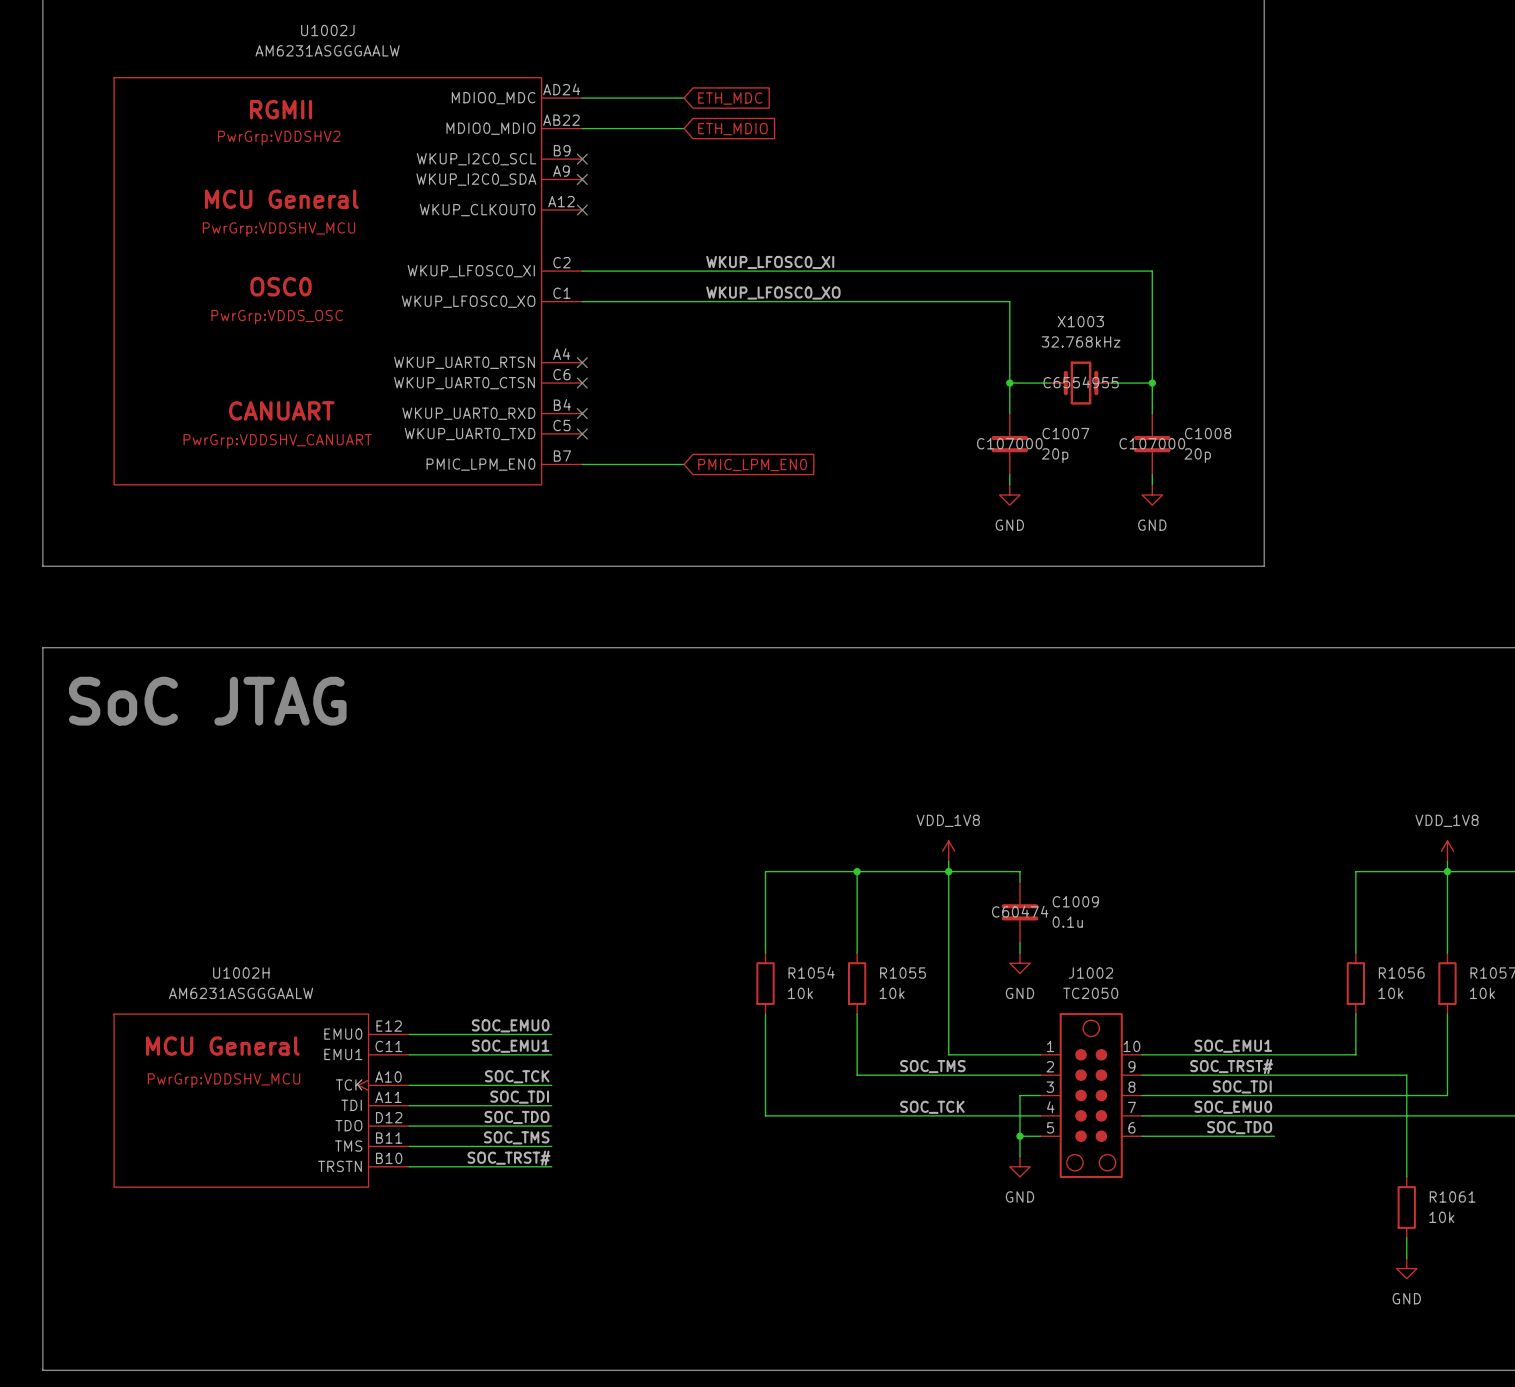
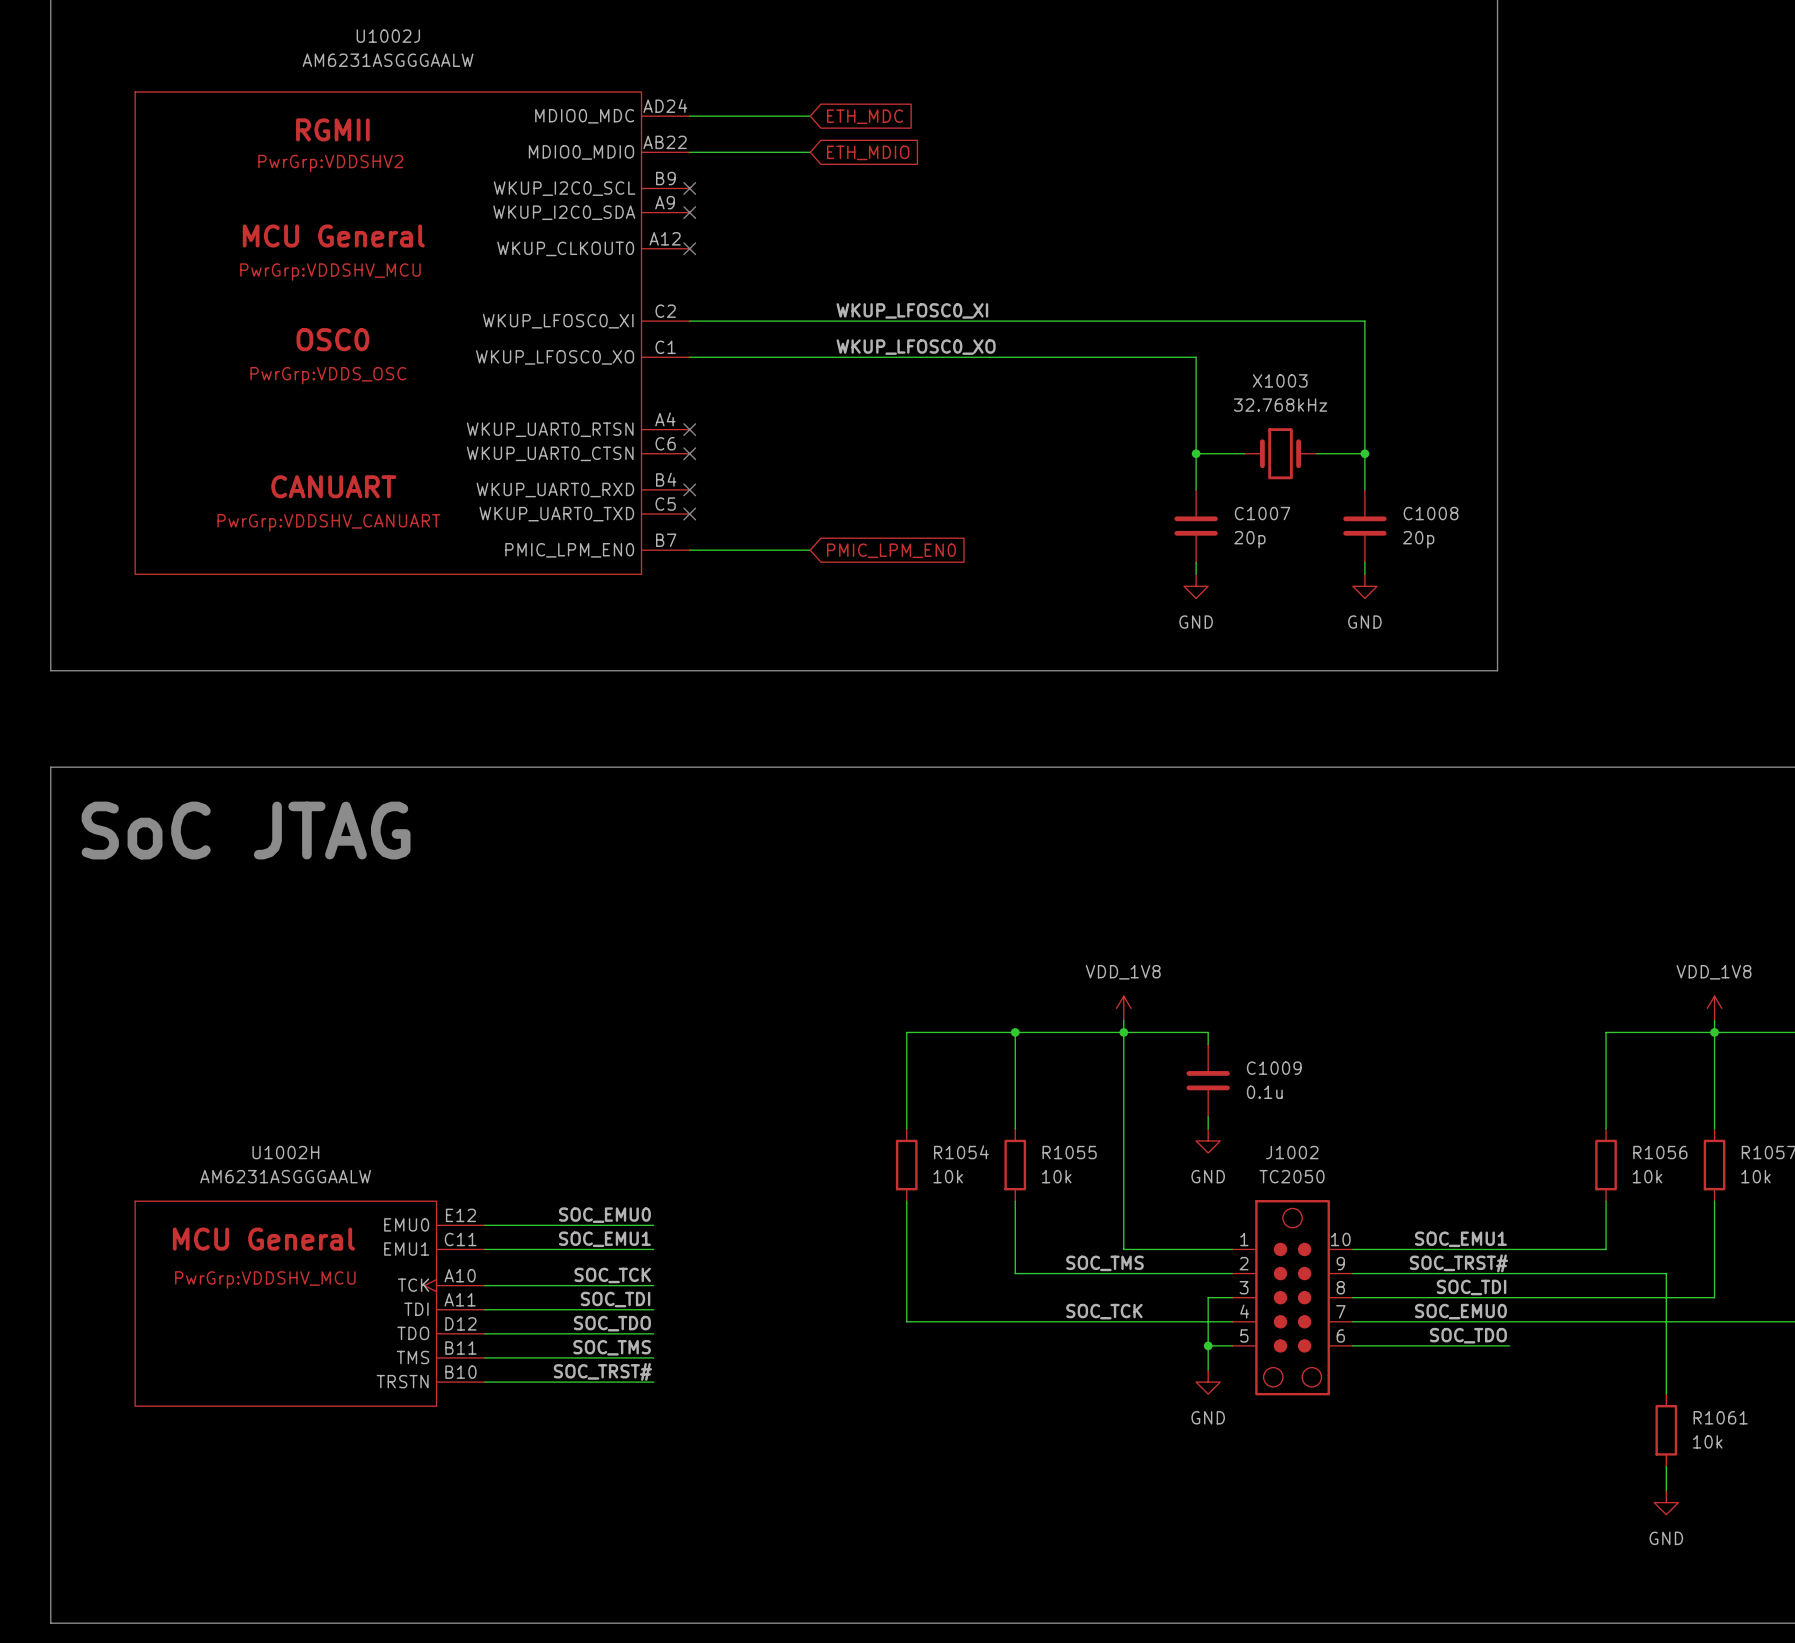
X1003 text: C6554955 (1081, 382) -> none
C1007 text: C107000 (1009, 443) -> none
C1008 text: C107000 (1152, 443) -> none
C1009 text: C60474 (1020, 911) -> none

